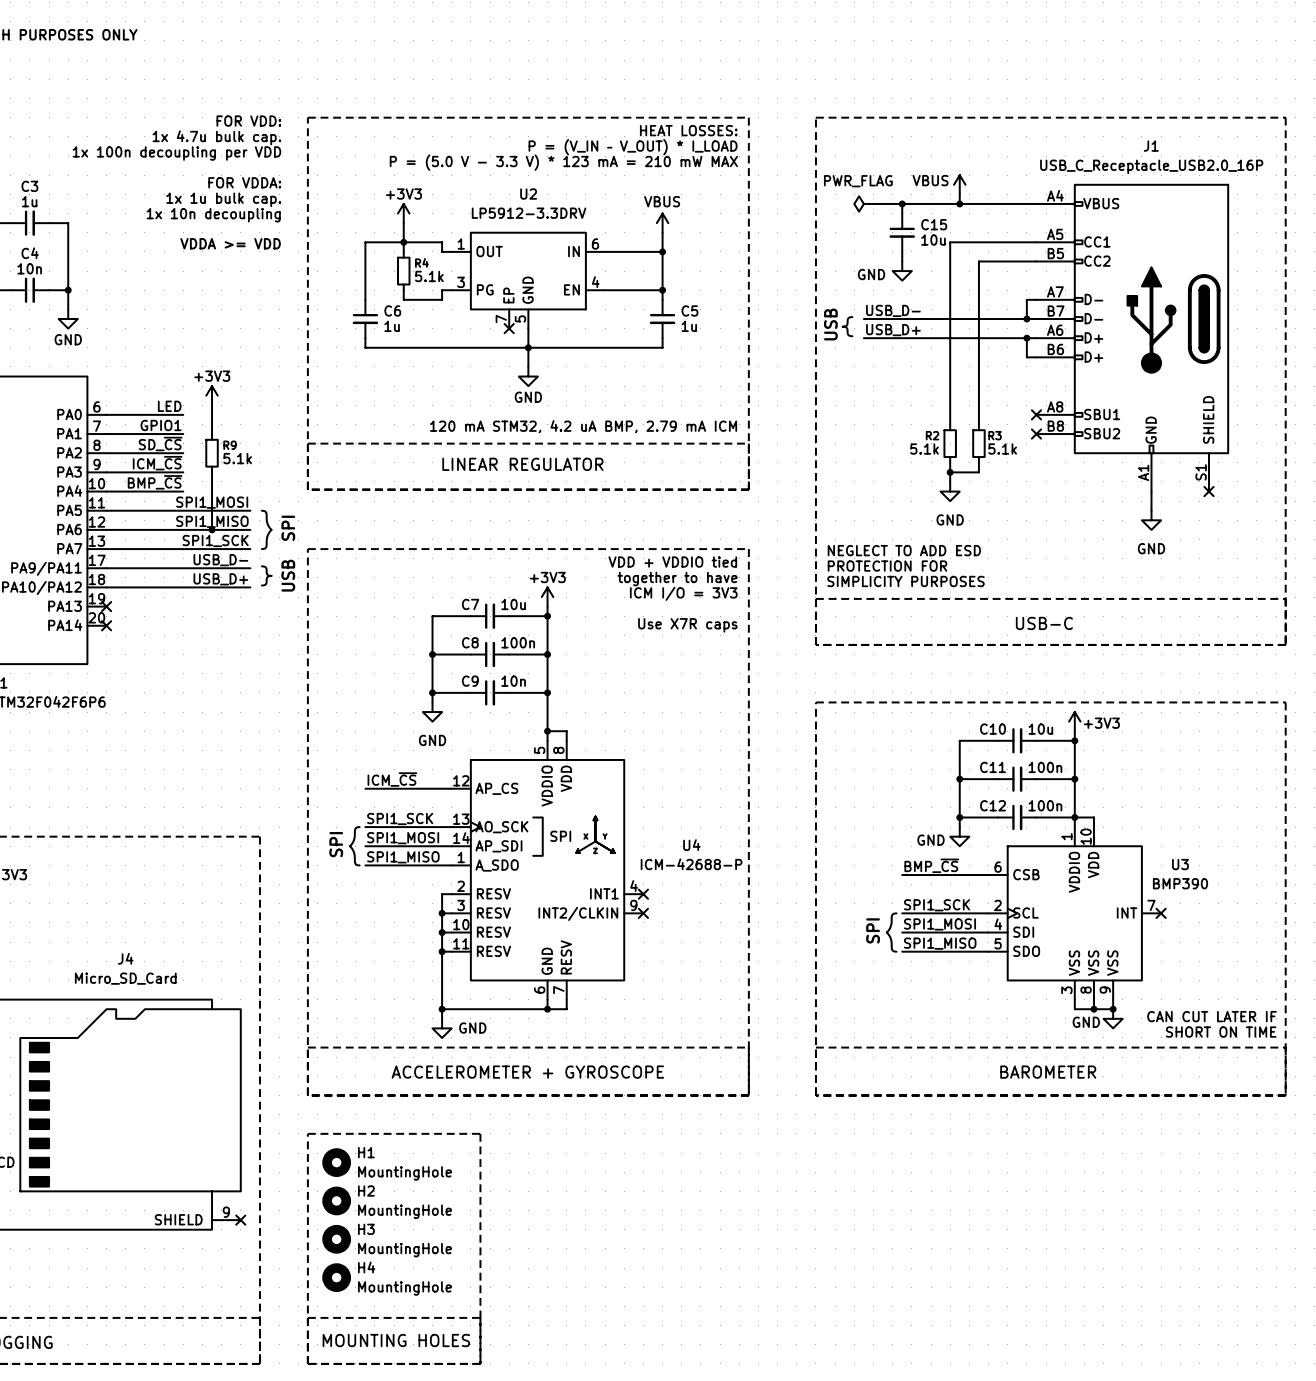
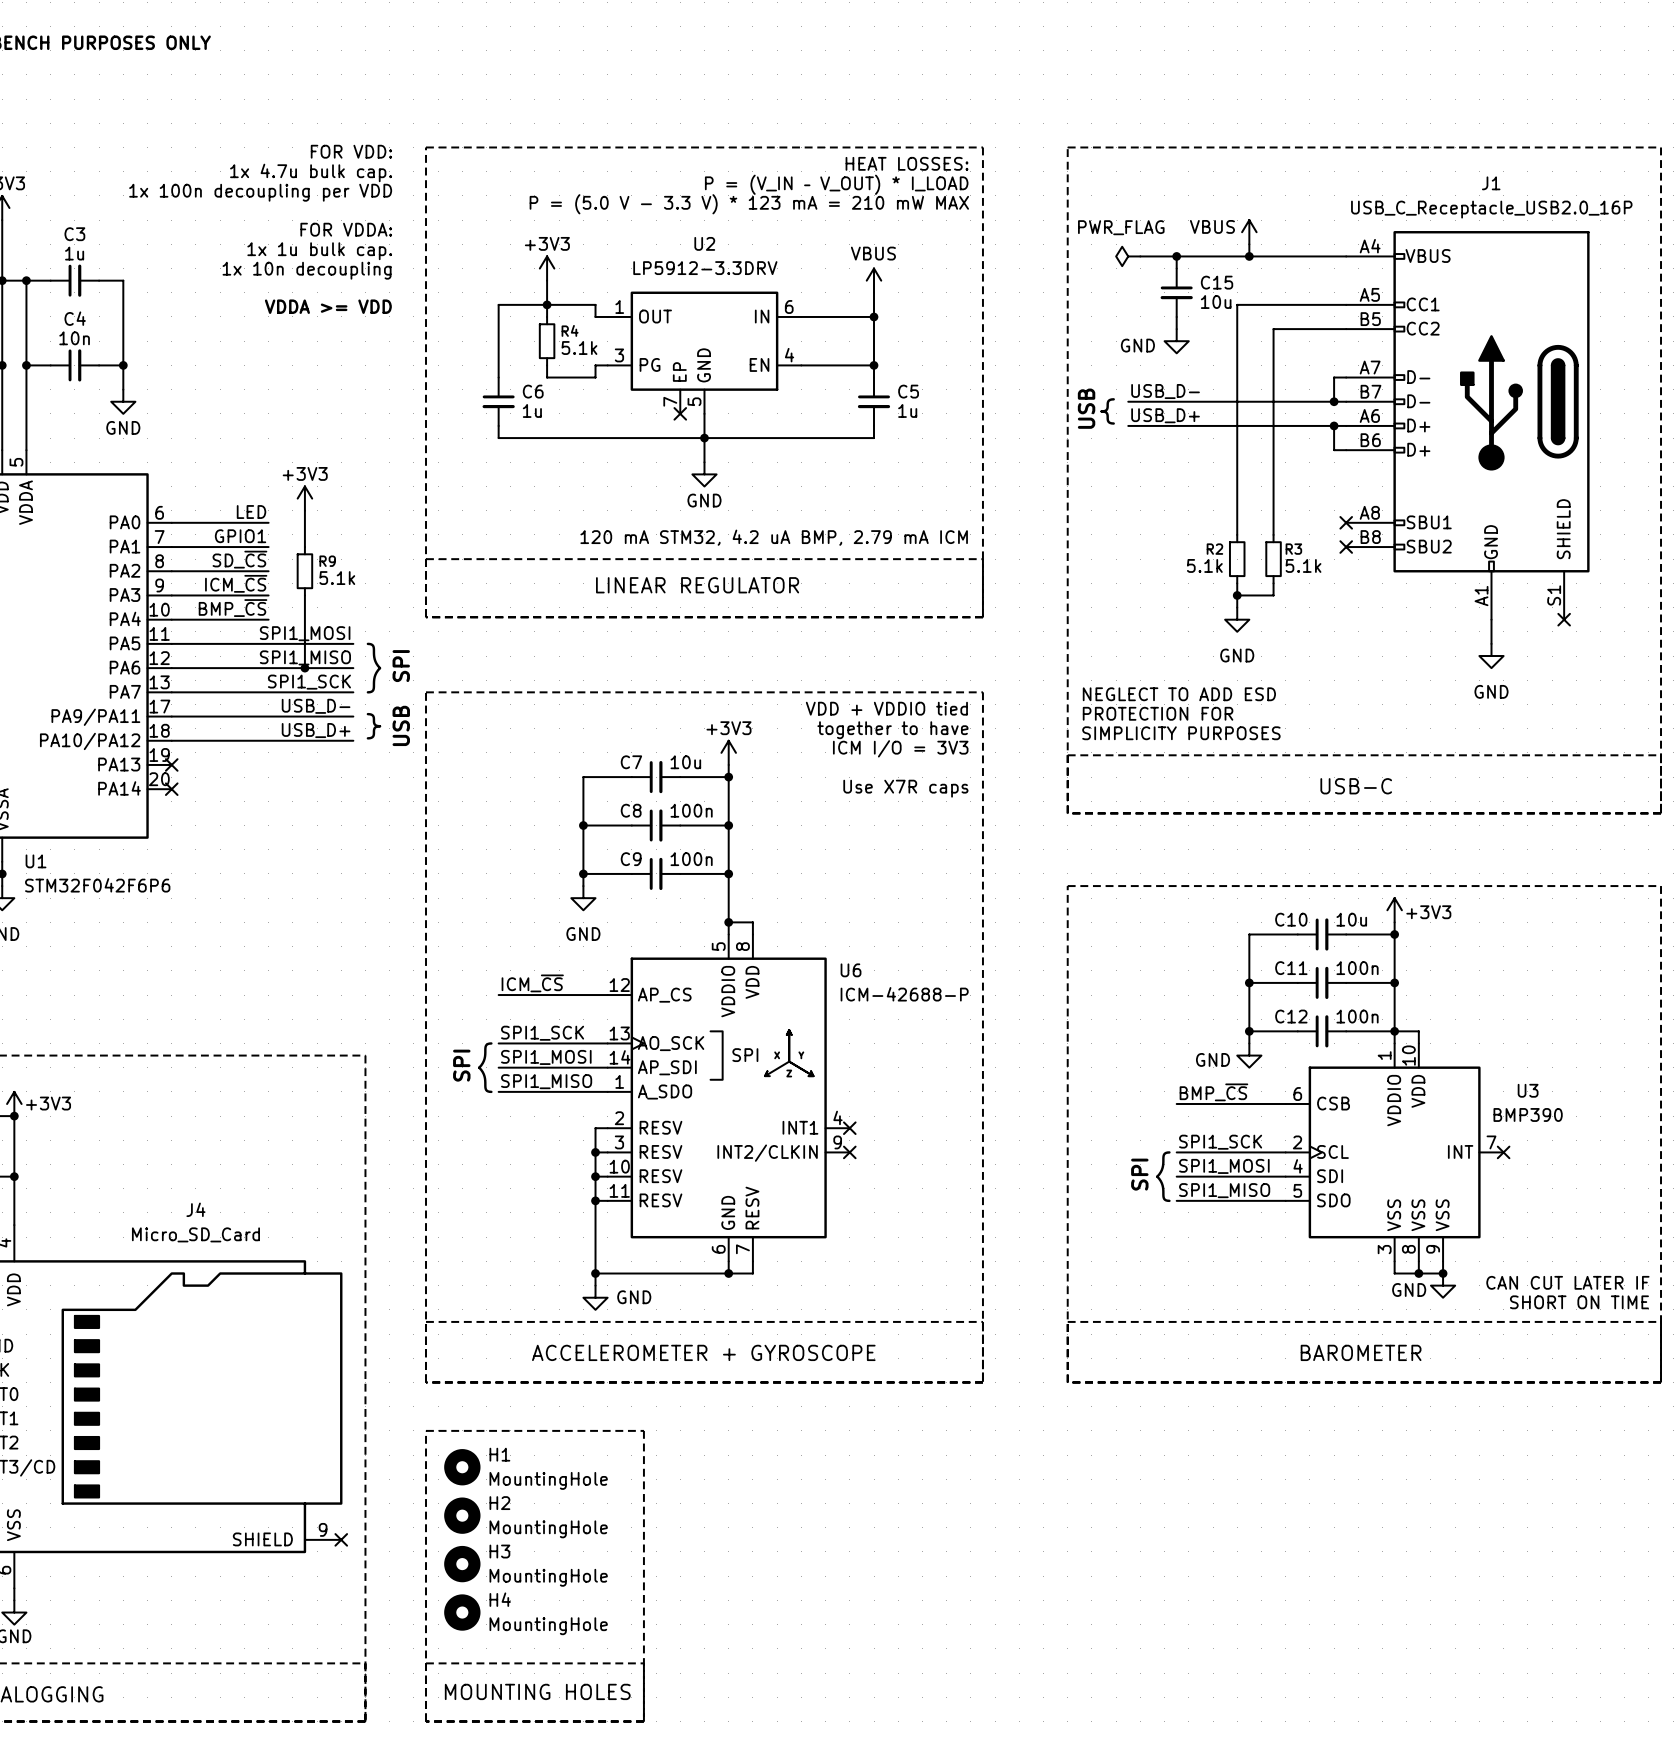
C9 value: 10n (513, 681) -> 100n (691, 859)
U4 name: U4 (691, 845) -> U6 (851, 970)
U4 value position: ICM-42688-P (691, 864) -> ICM-42688-P (904, 994)

